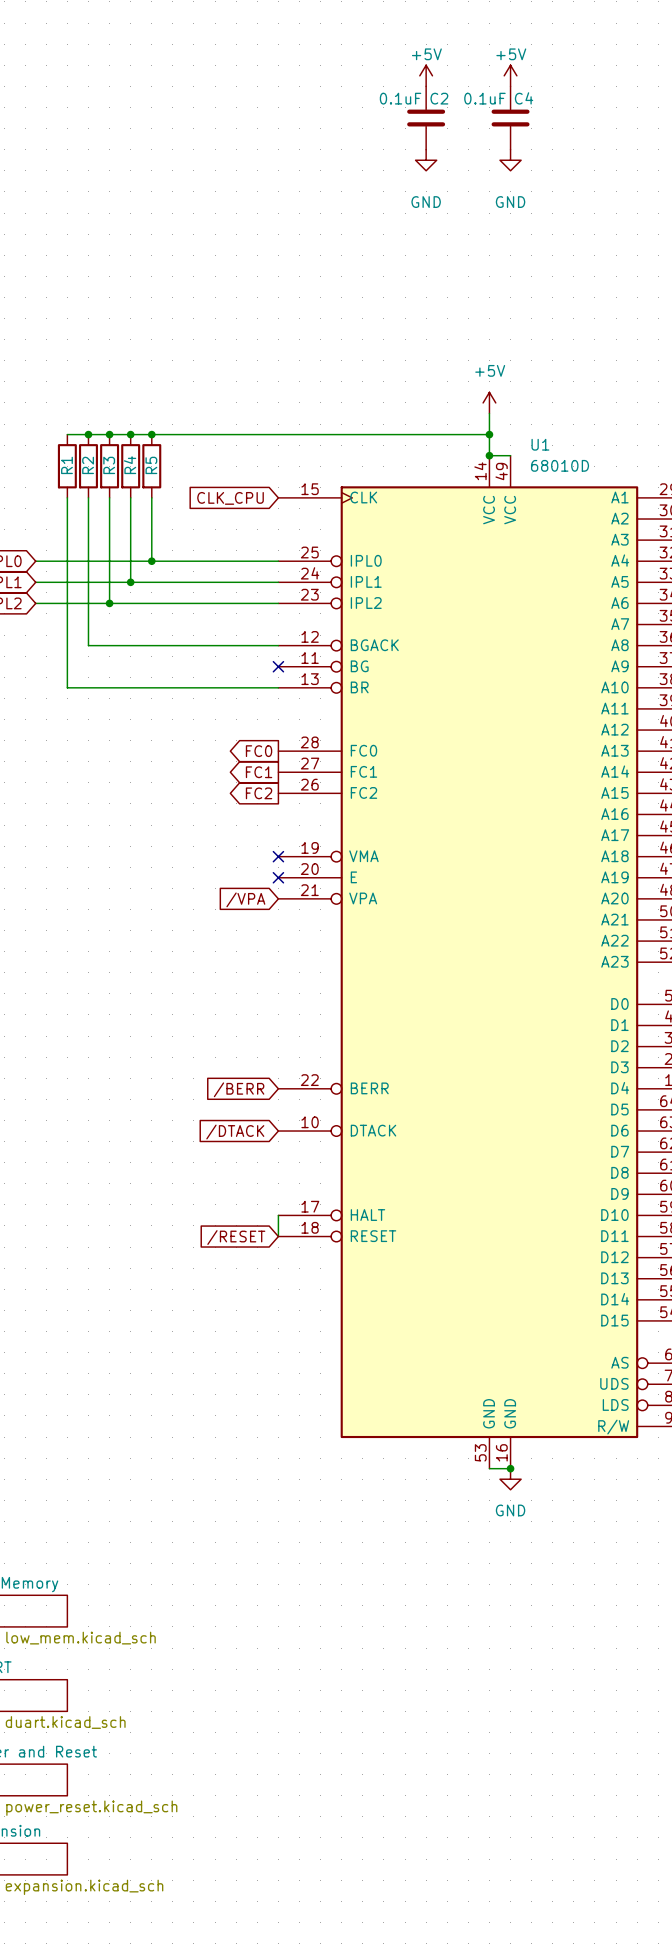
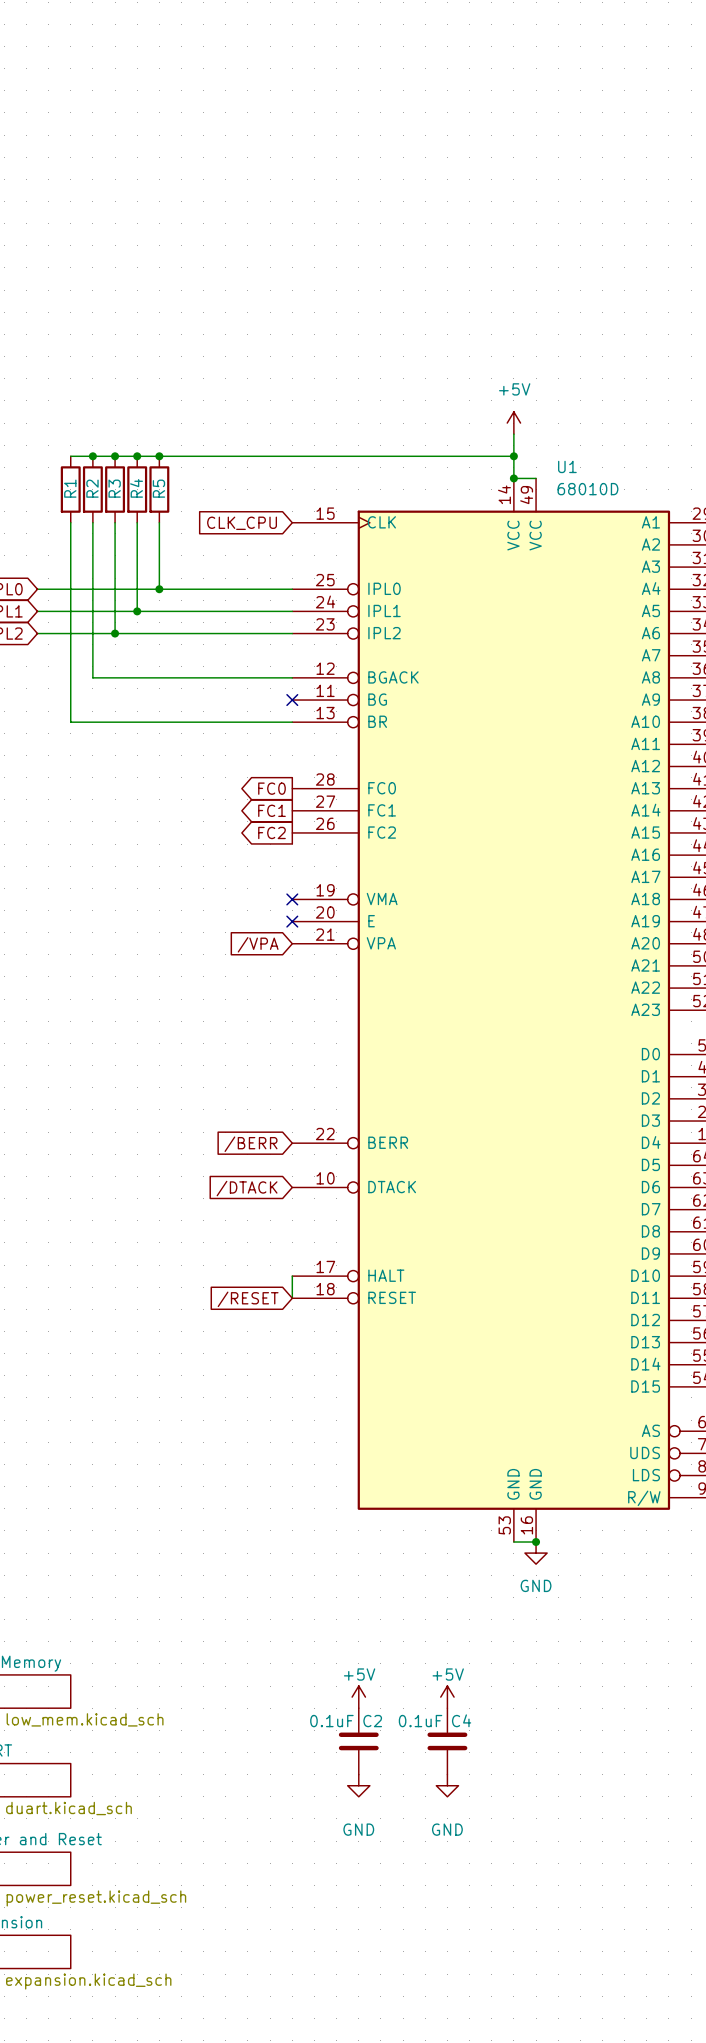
power symbol: +5V (426, 75) -> none
power symbol: +5V (510, 75) -> none
C2 position: (426, 118) -> (358, 1741)
C4 position: (510, 118) -> (447, 1741)
power symbol: GND (426, 160) -> none
power symbol: GND (510, 160) -> none
power symbol: none -> +5V (358, 1697)
power symbol: none -> +5V (447, 1697)
power symbol: none -> GND (358, 1785)
power symbol: none -> GND (447, 1785)

